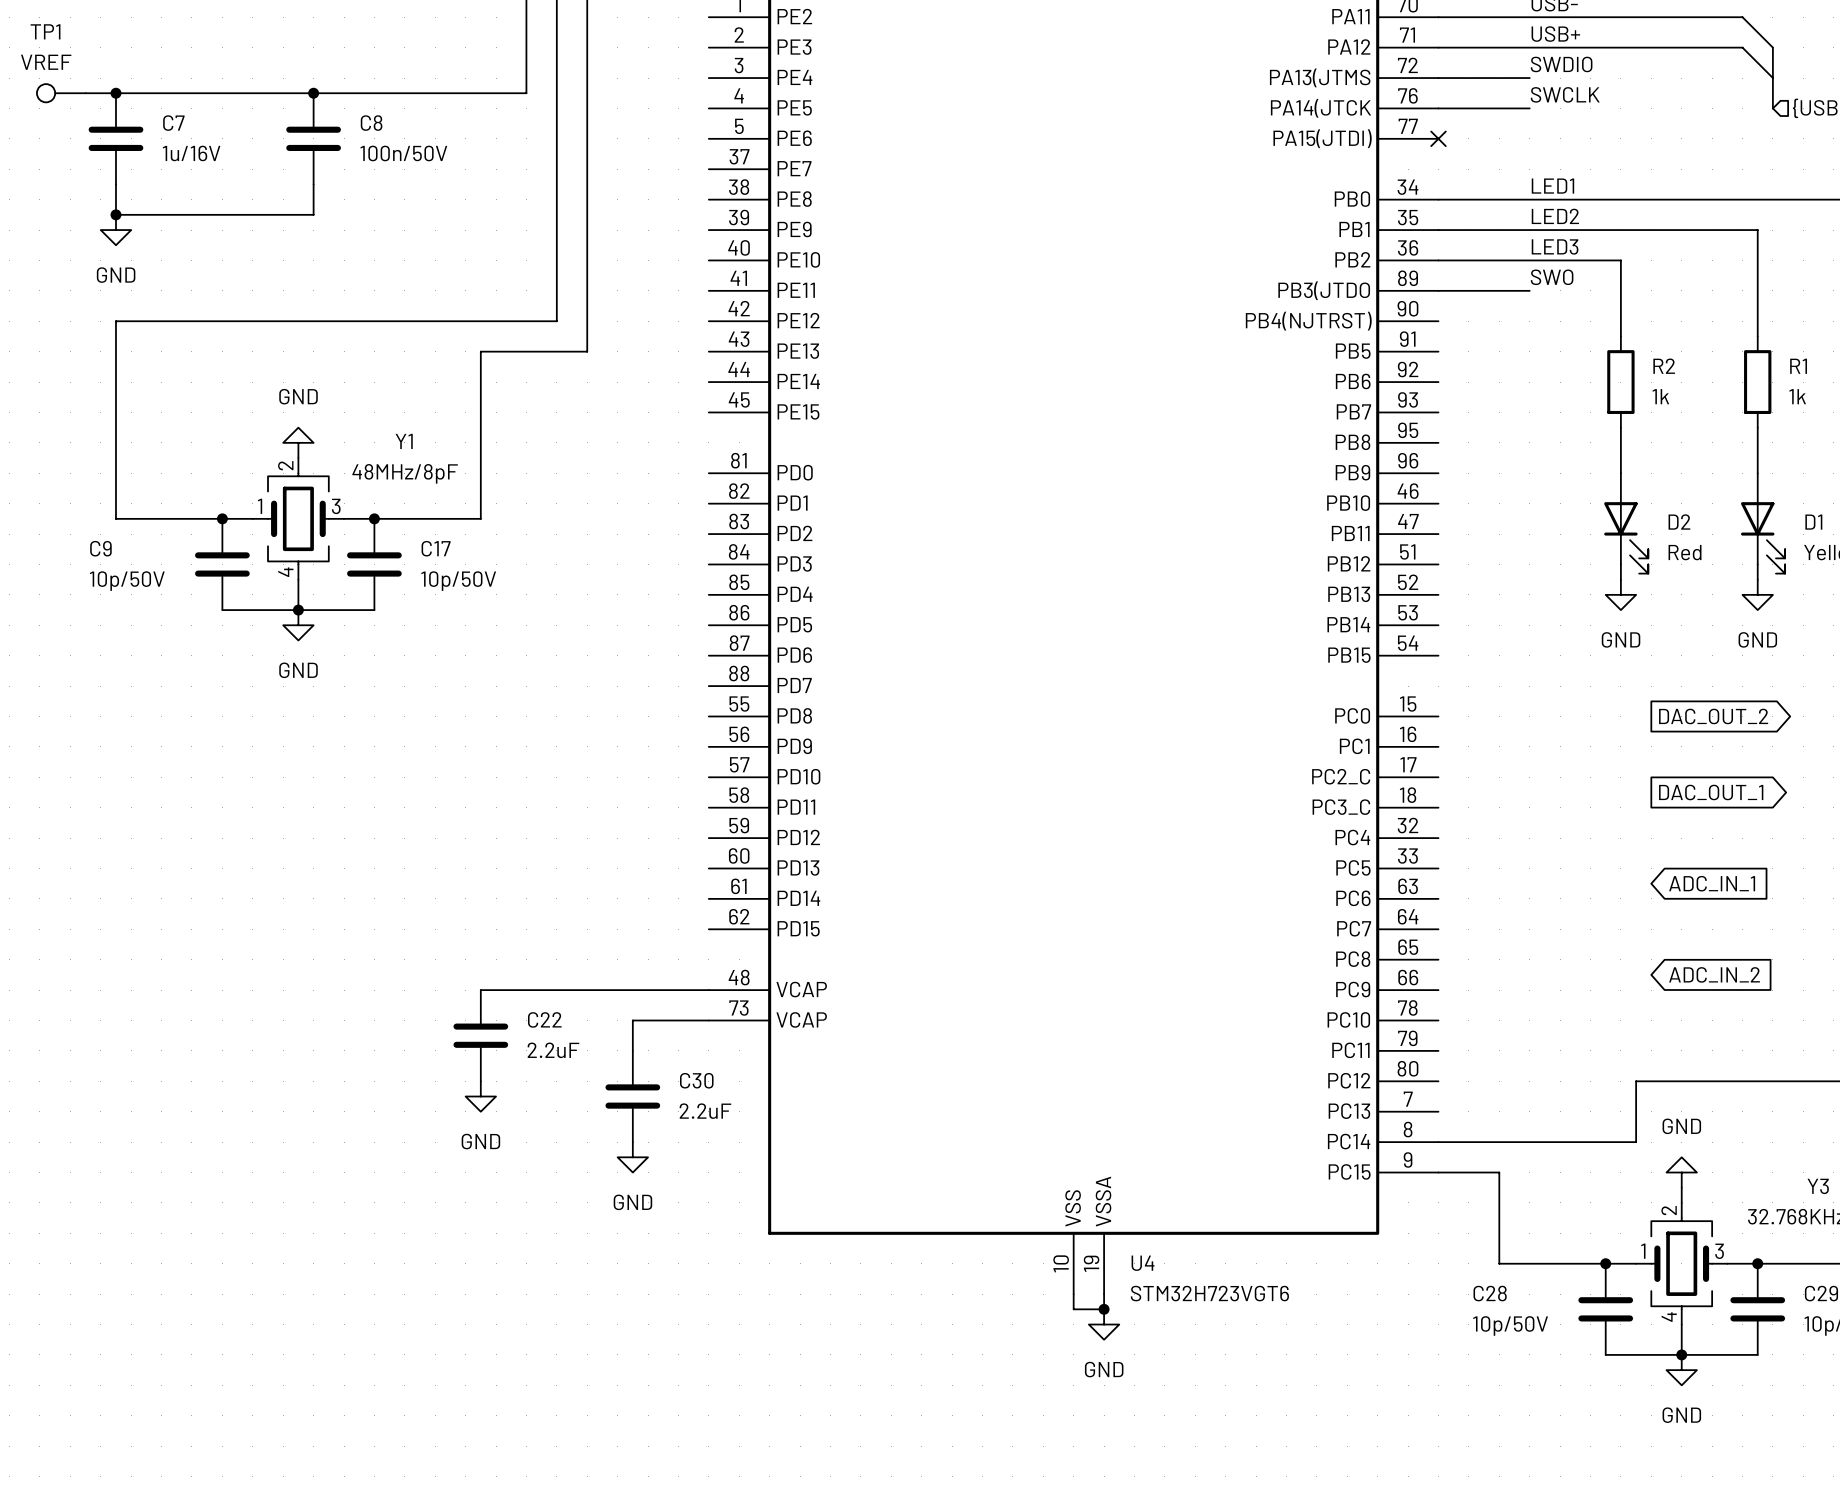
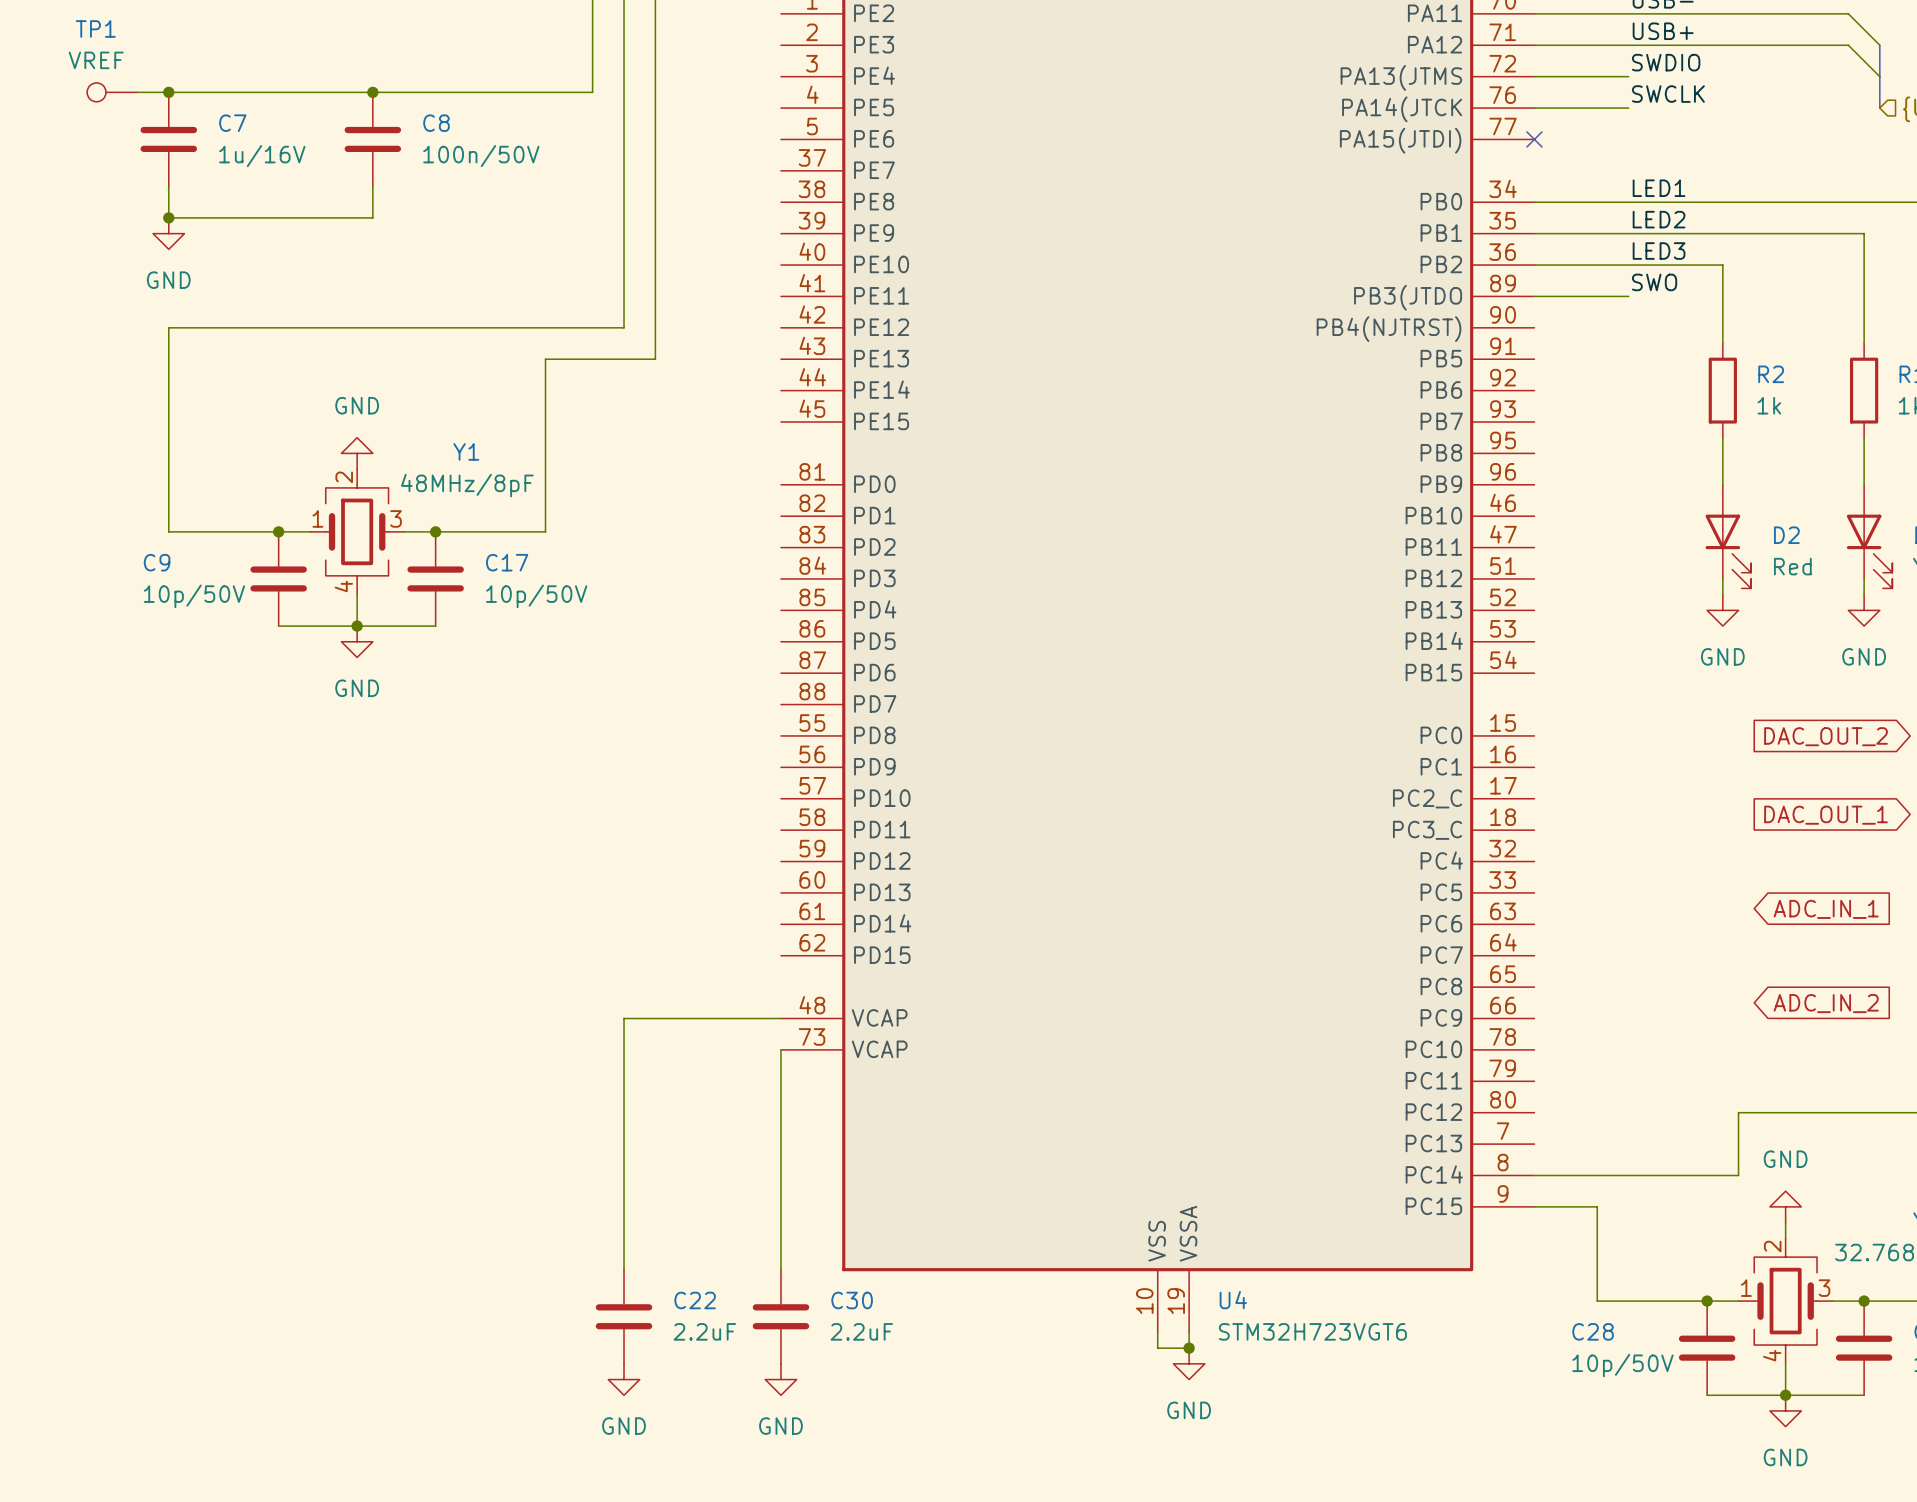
wire: (480, 990) (556, 990) -> (624, 1269) (624, 1018)
wire: (708, 1020) (632, 1020) (632, 1050) -> (780, 1049) (780, 1269)
C22 position: (480, 1035) -> (624, 1316)
power symbol: GND (480, 1096) -> none
C30 position: (632, 1096) -> (780, 1316)
power symbol: GND (632, 1157) -> none
power symbol: none -> GND (624, 1379)
power symbol: none -> GND (780, 1379)

